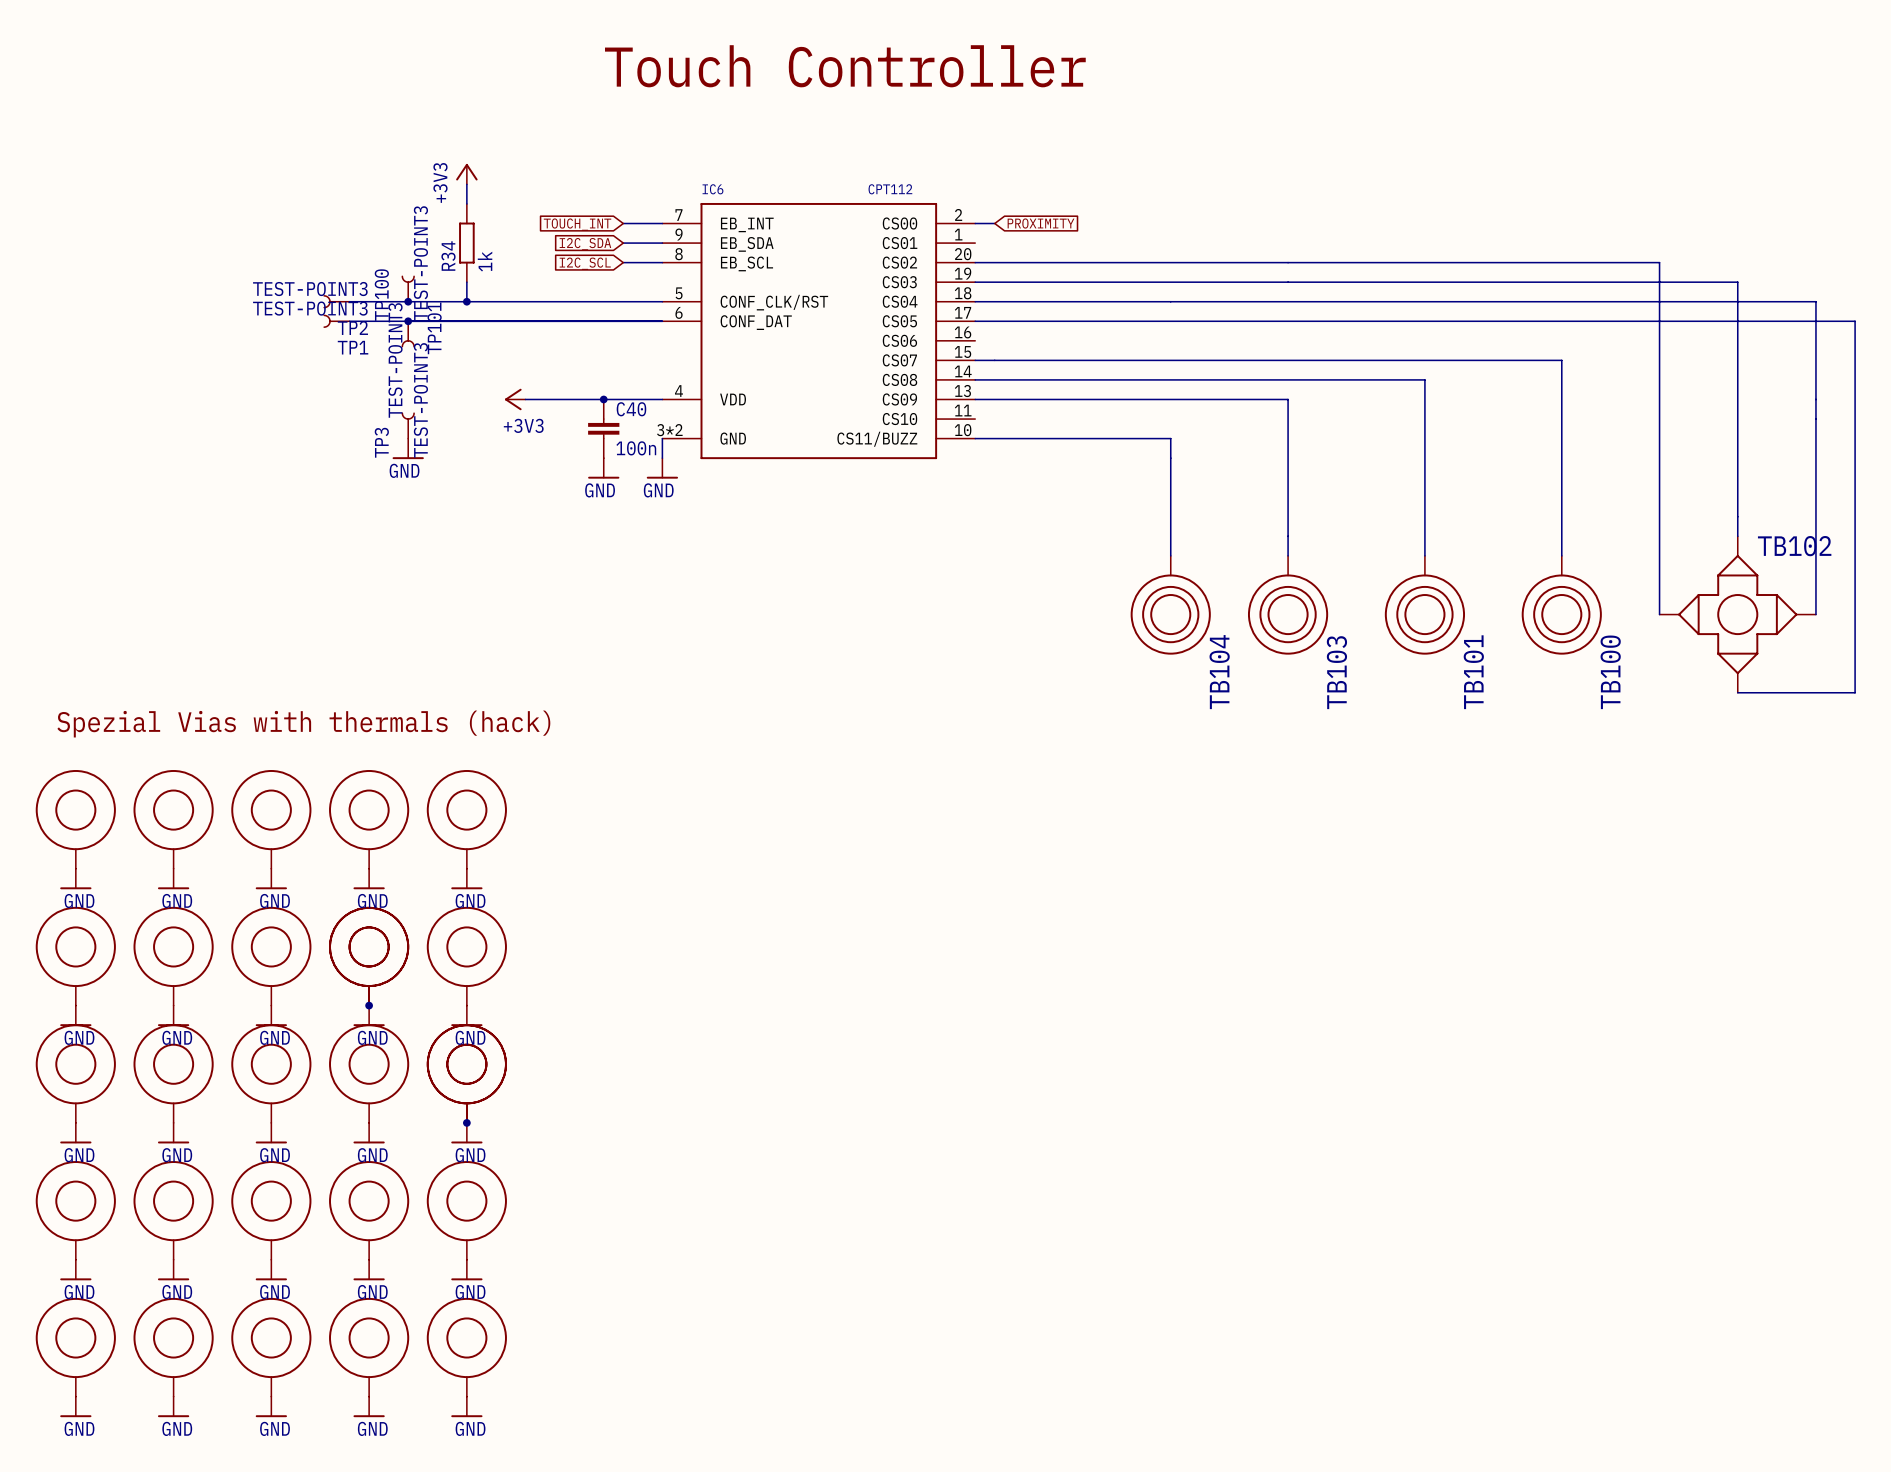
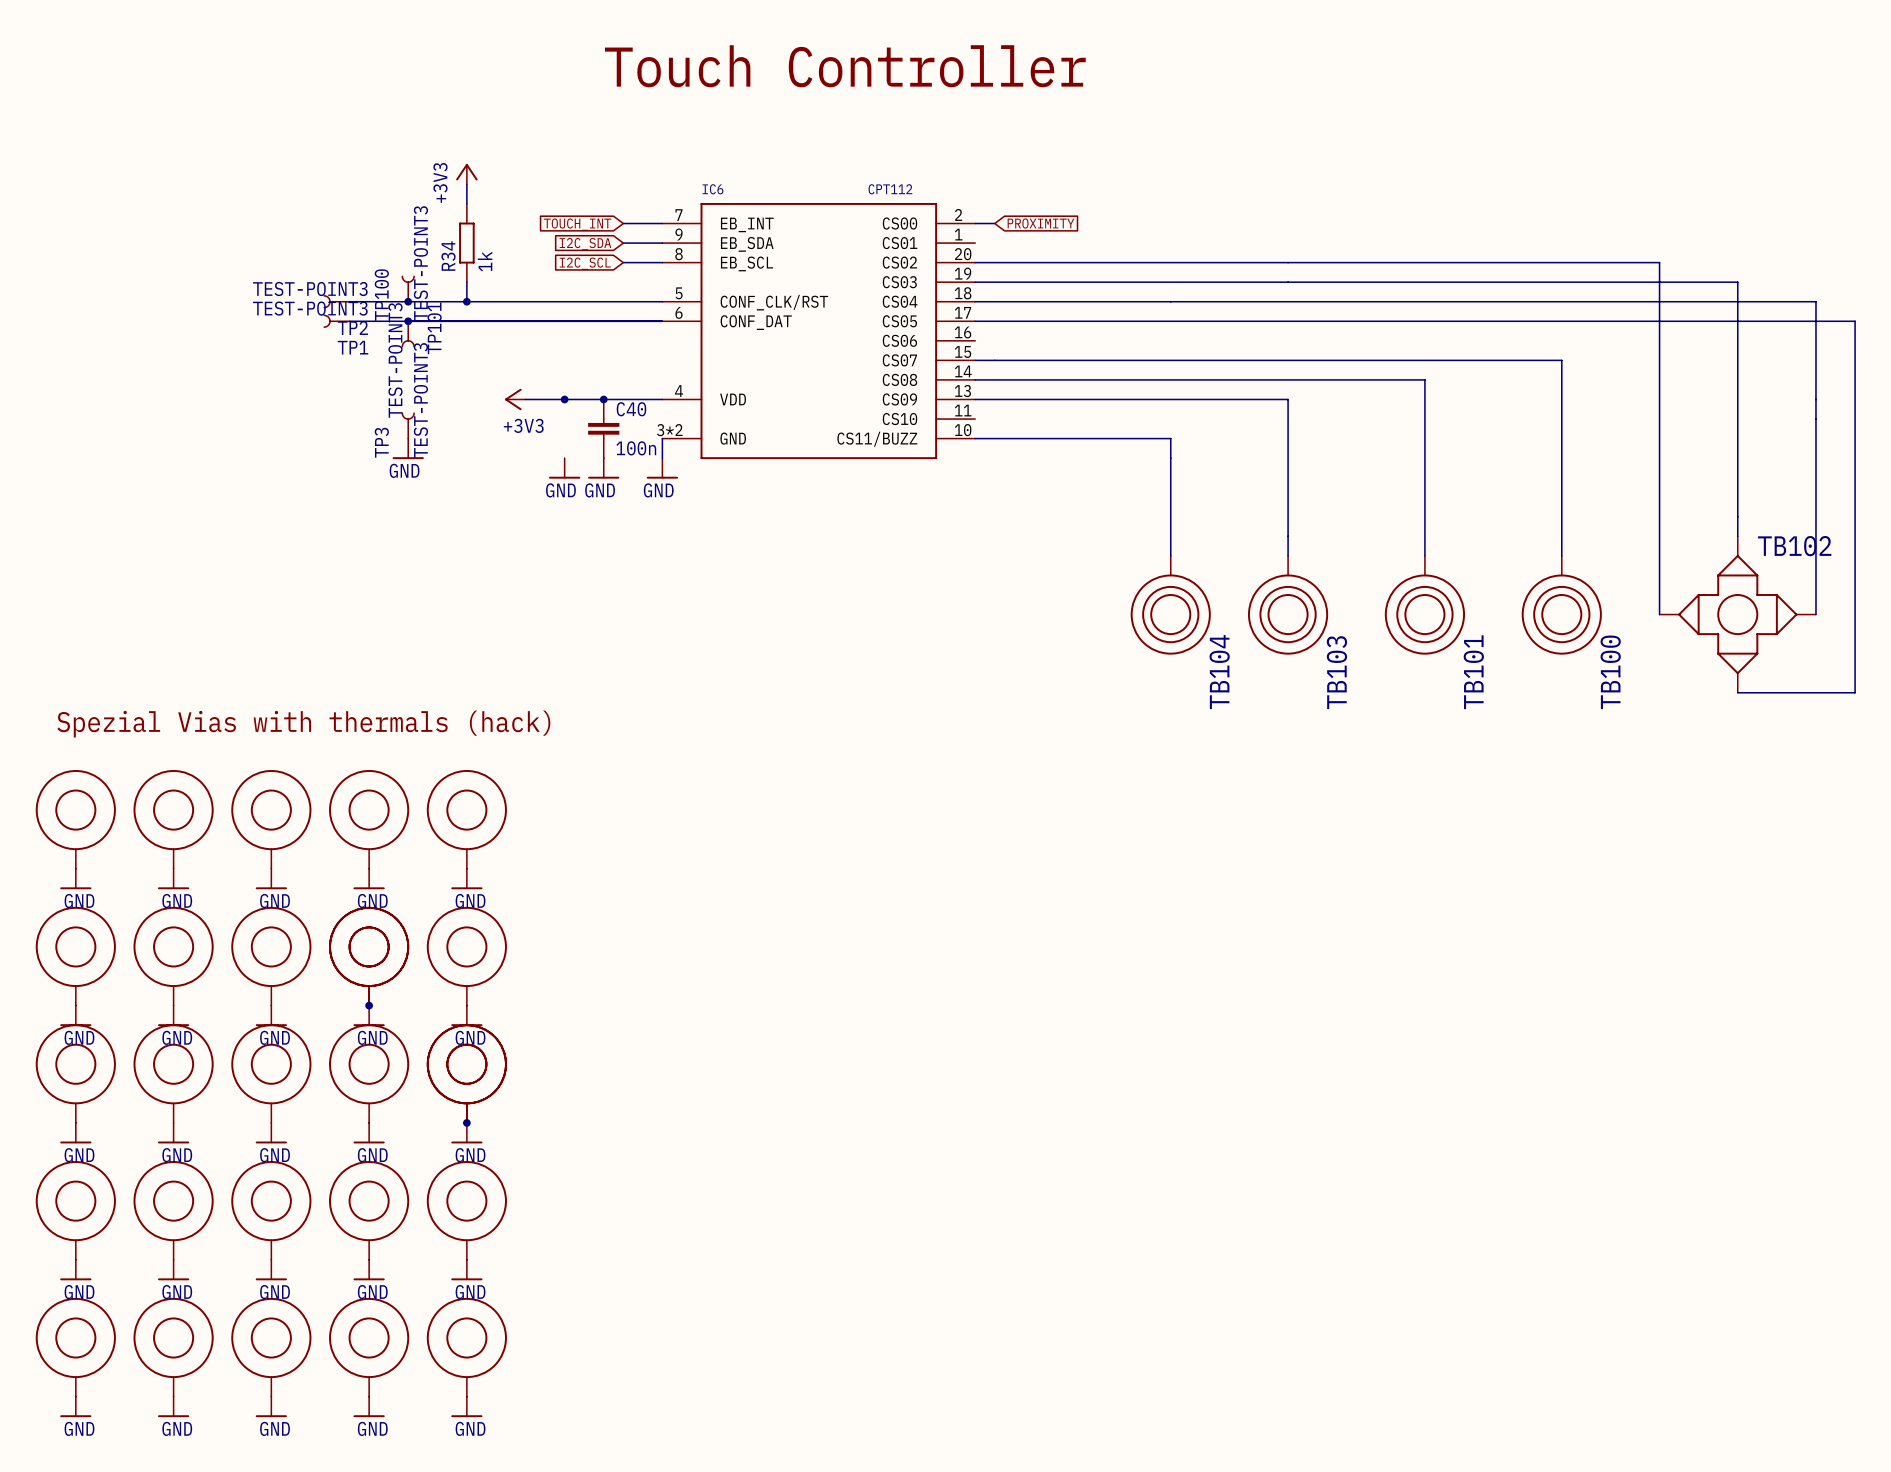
junction: none -> (564, 399)
power symbol: none -> GND (564, 468)

